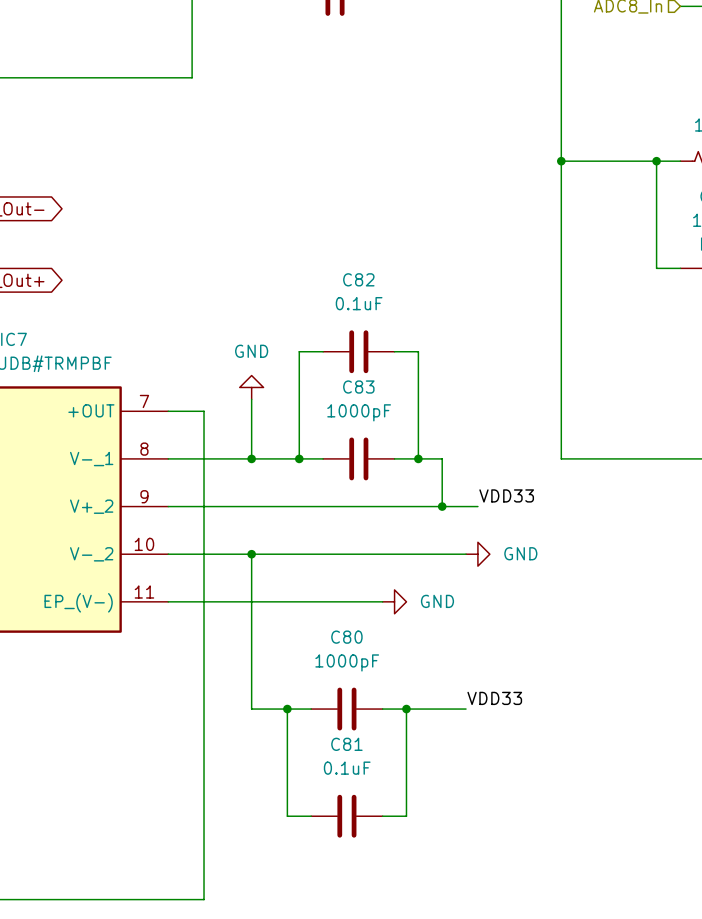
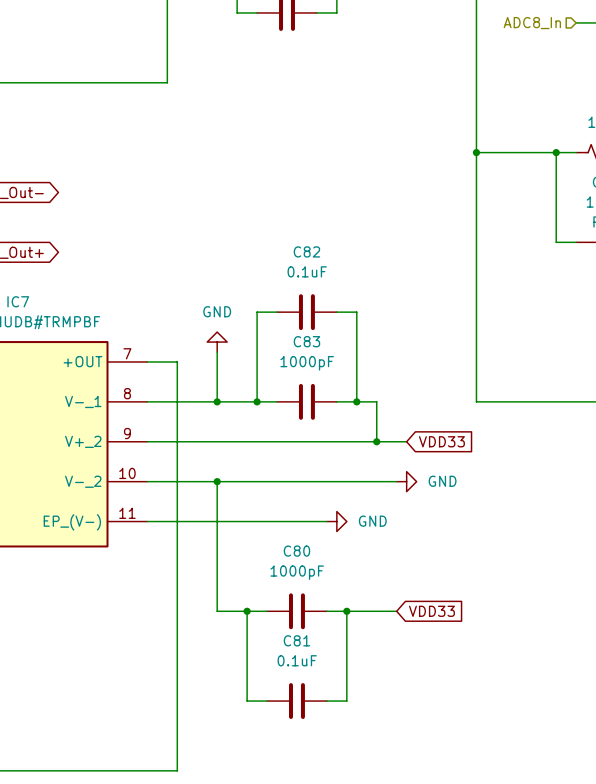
label: VDD33 (506, 495) -> none
global label: none -> VDD33 (441, 441)
label: VDD33 (494, 698) -> none
global label: none -> VDD33 (431, 611)

